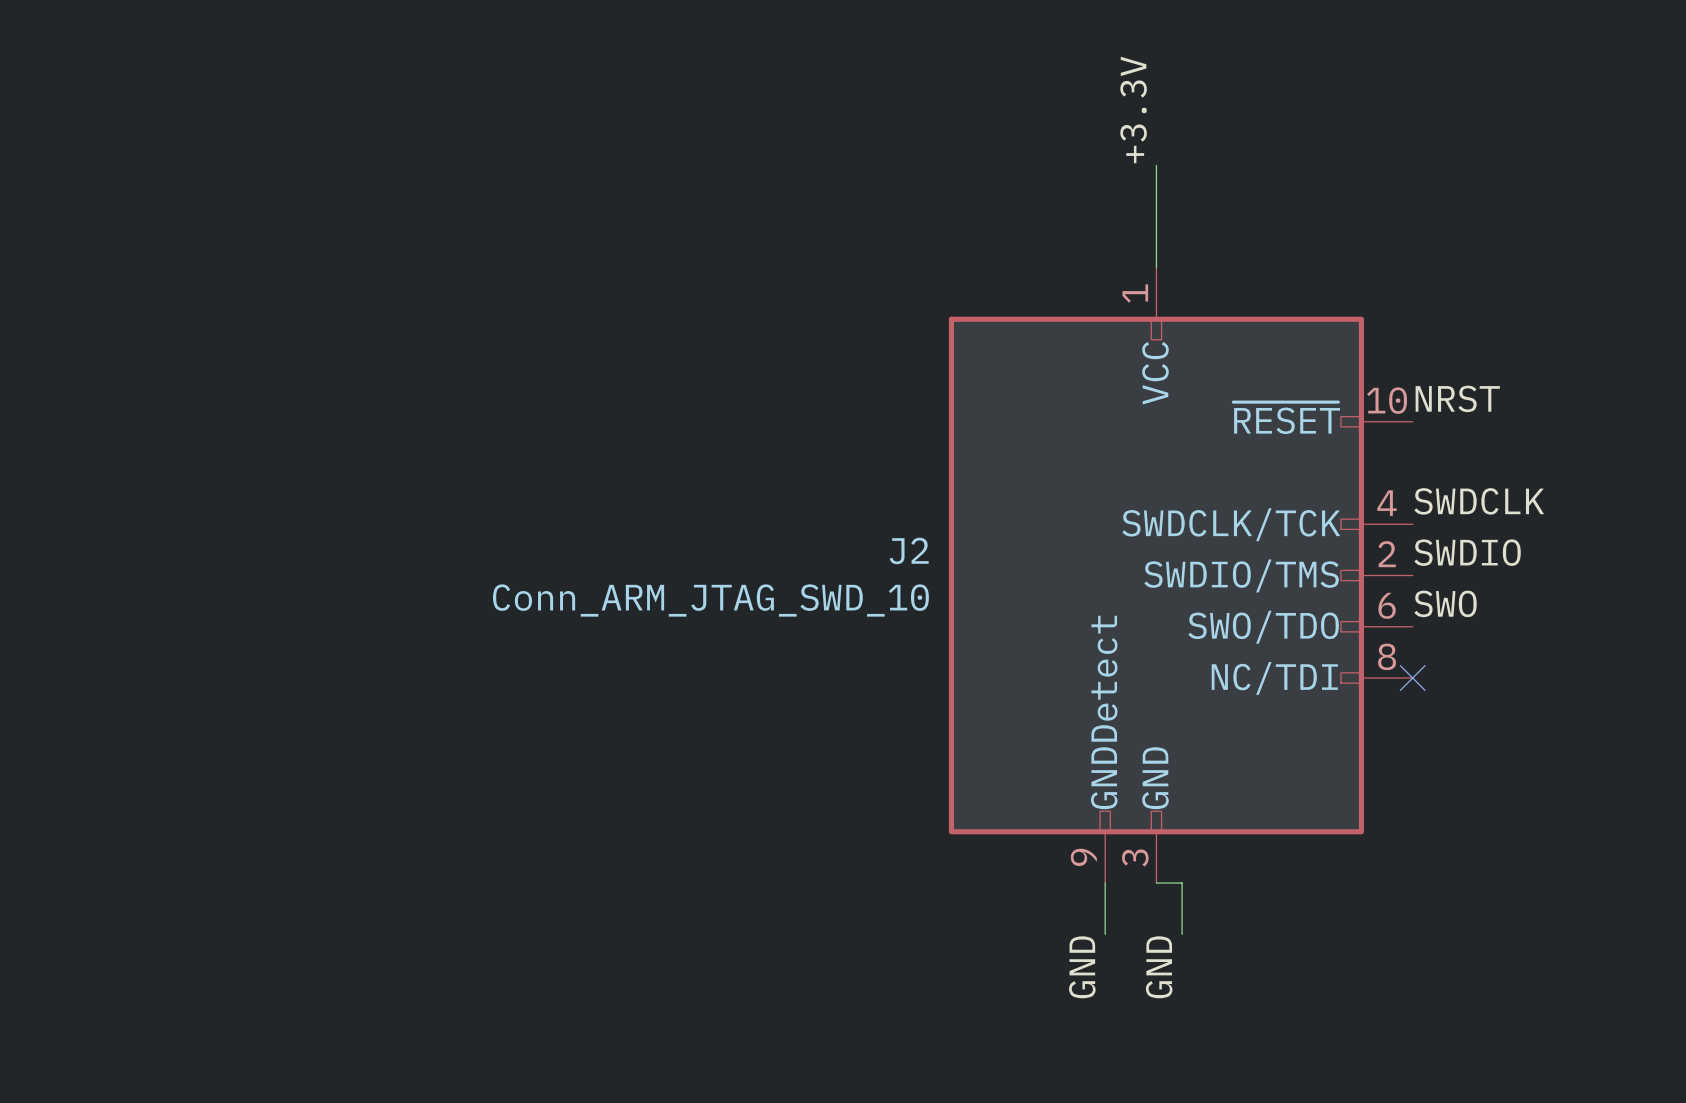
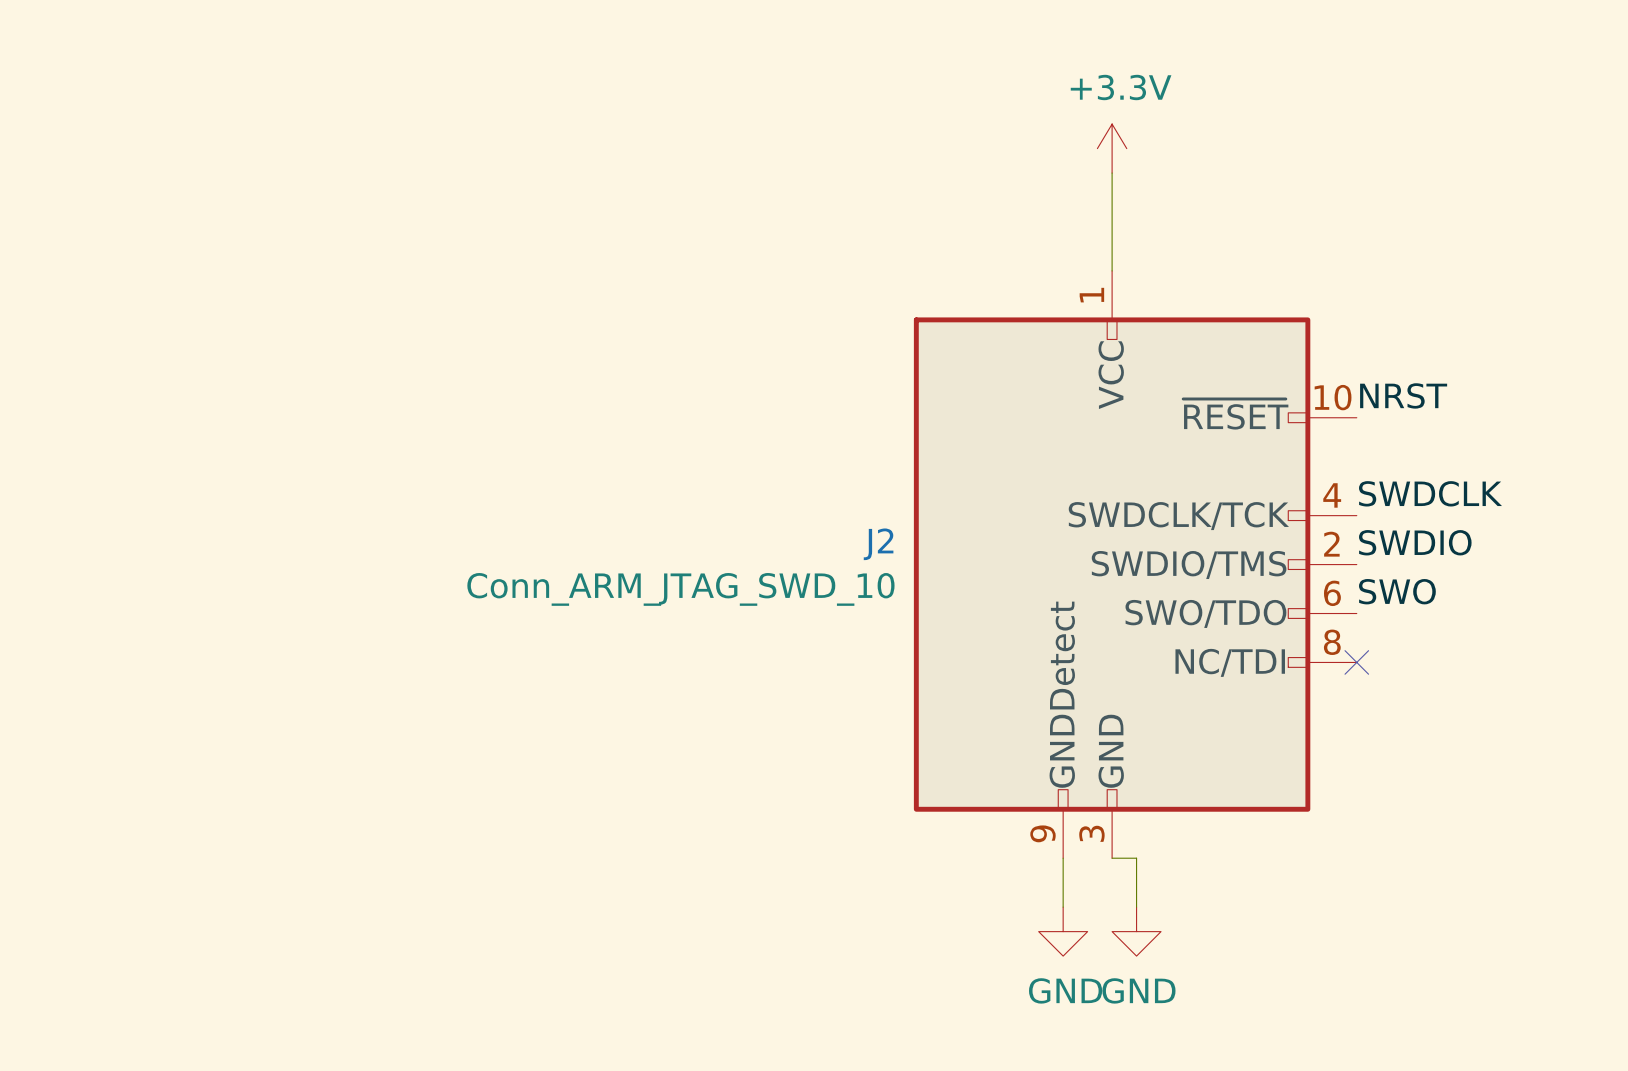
label: +3.3V (1133, 109) -> none
power symbol: none -> +3.3V (1112, 148)
power symbol: none -> GND (1063, 931)
power symbol: none -> GND (1136, 931)
label: GND (1082, 967) -> none
label: GND (1159, 967) -> none

